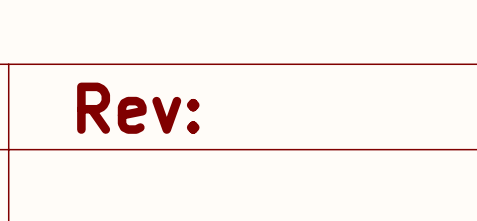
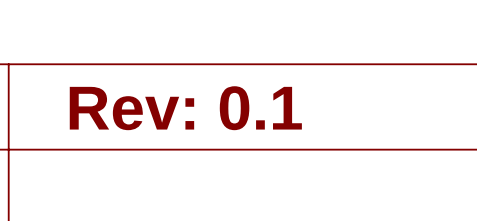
title block: Rev: (138, 108) -> Rev: 0.1 (185, 108)

